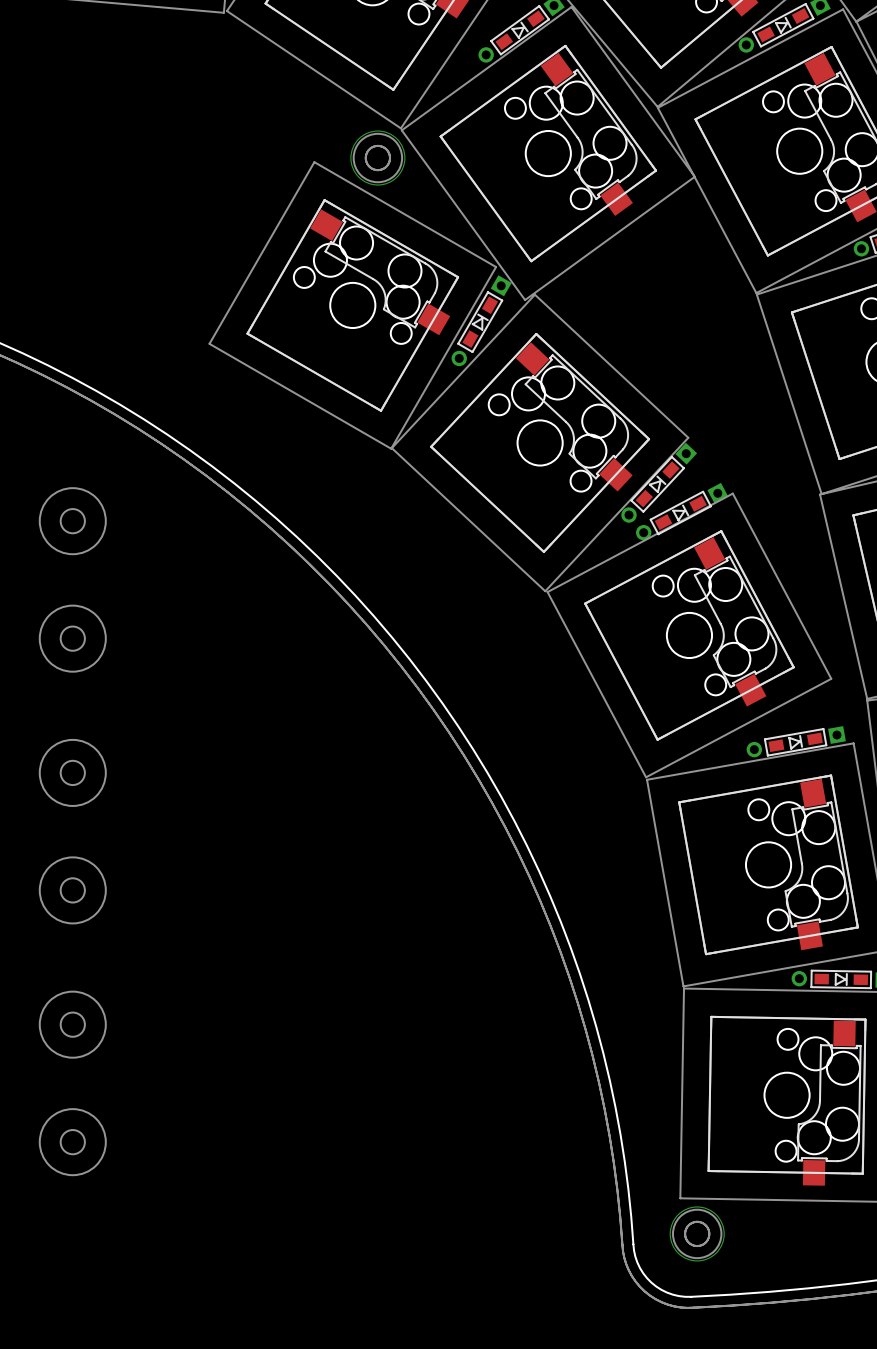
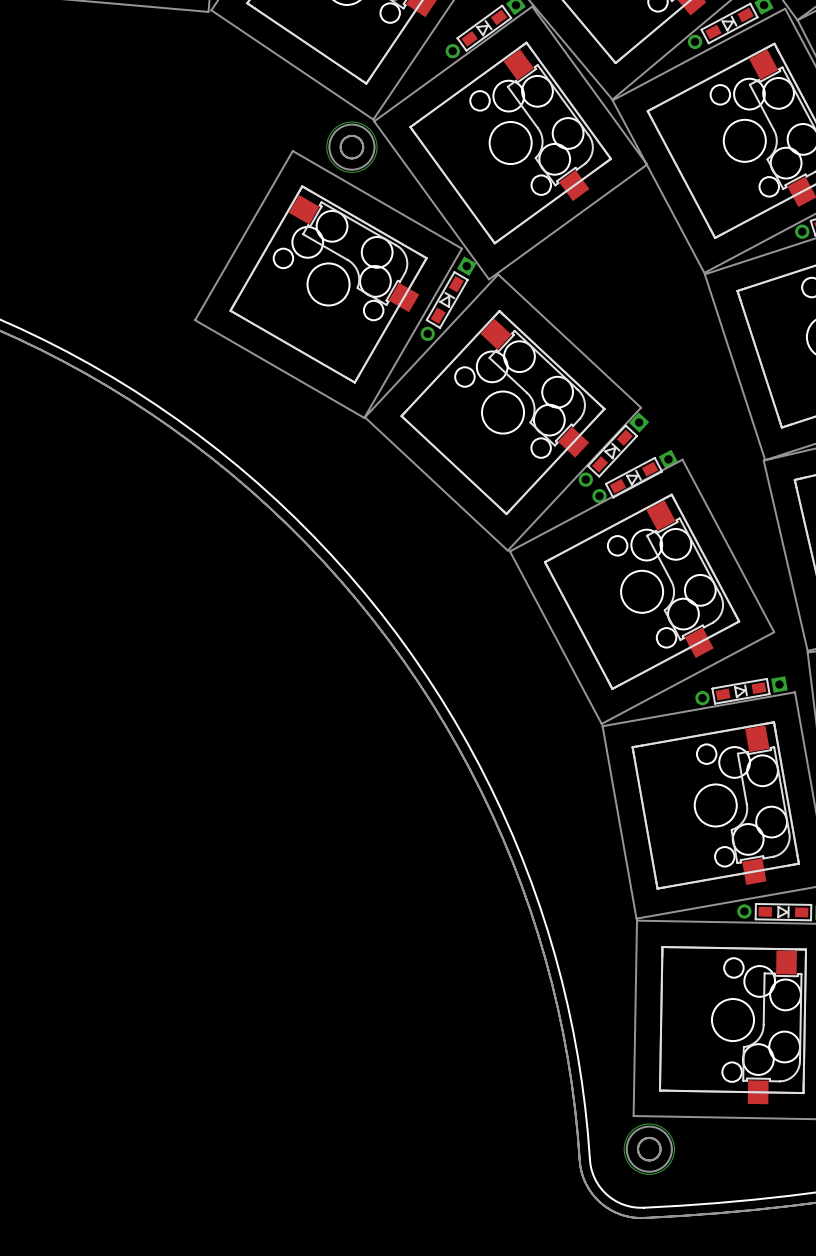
drawing: [38, 487, 107, 556] -> none
drawing: [38, 604, 107, 673] -> none
drawing: [38, 739, 107, 807] -> none
drawing: [38, 856, 107, 925] -> none
drawing: [38, 990, 107, 1059] -> none
drawing: [38, 1108, 107, 1177] -> none

